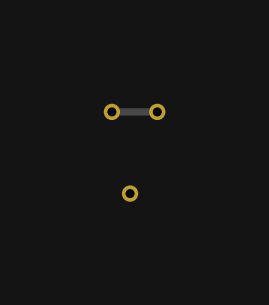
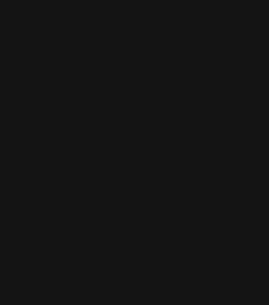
via: (111, 111) -> none
track: (157, 111) (111, 111) -> none
via: (157, 111) -> none
via: (130, 193) -> none

